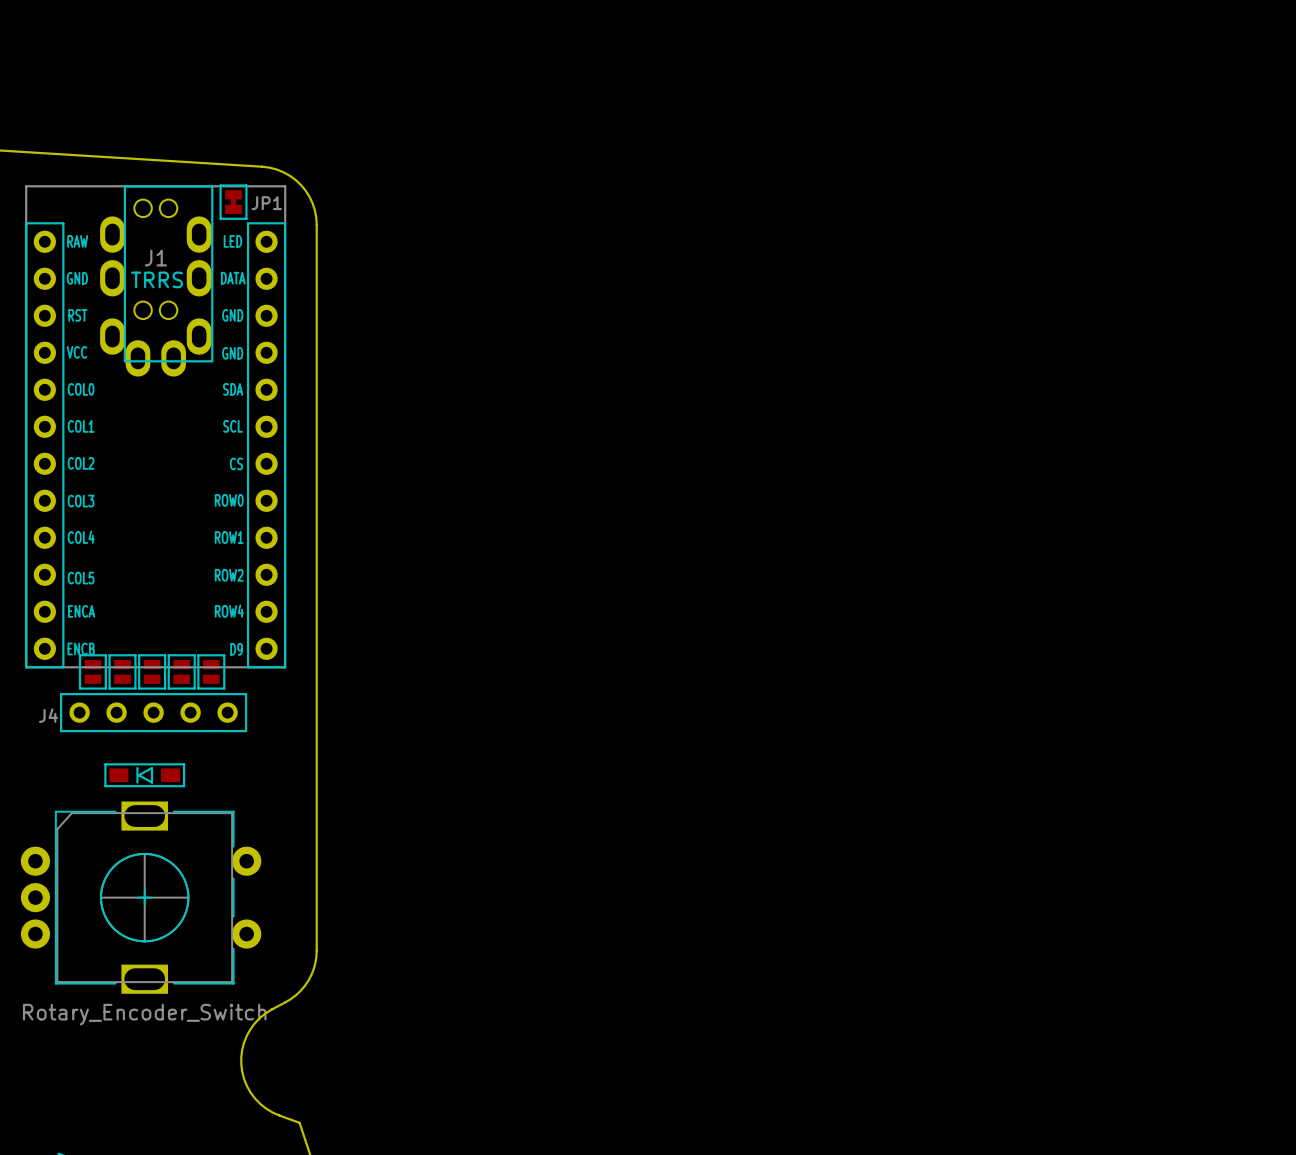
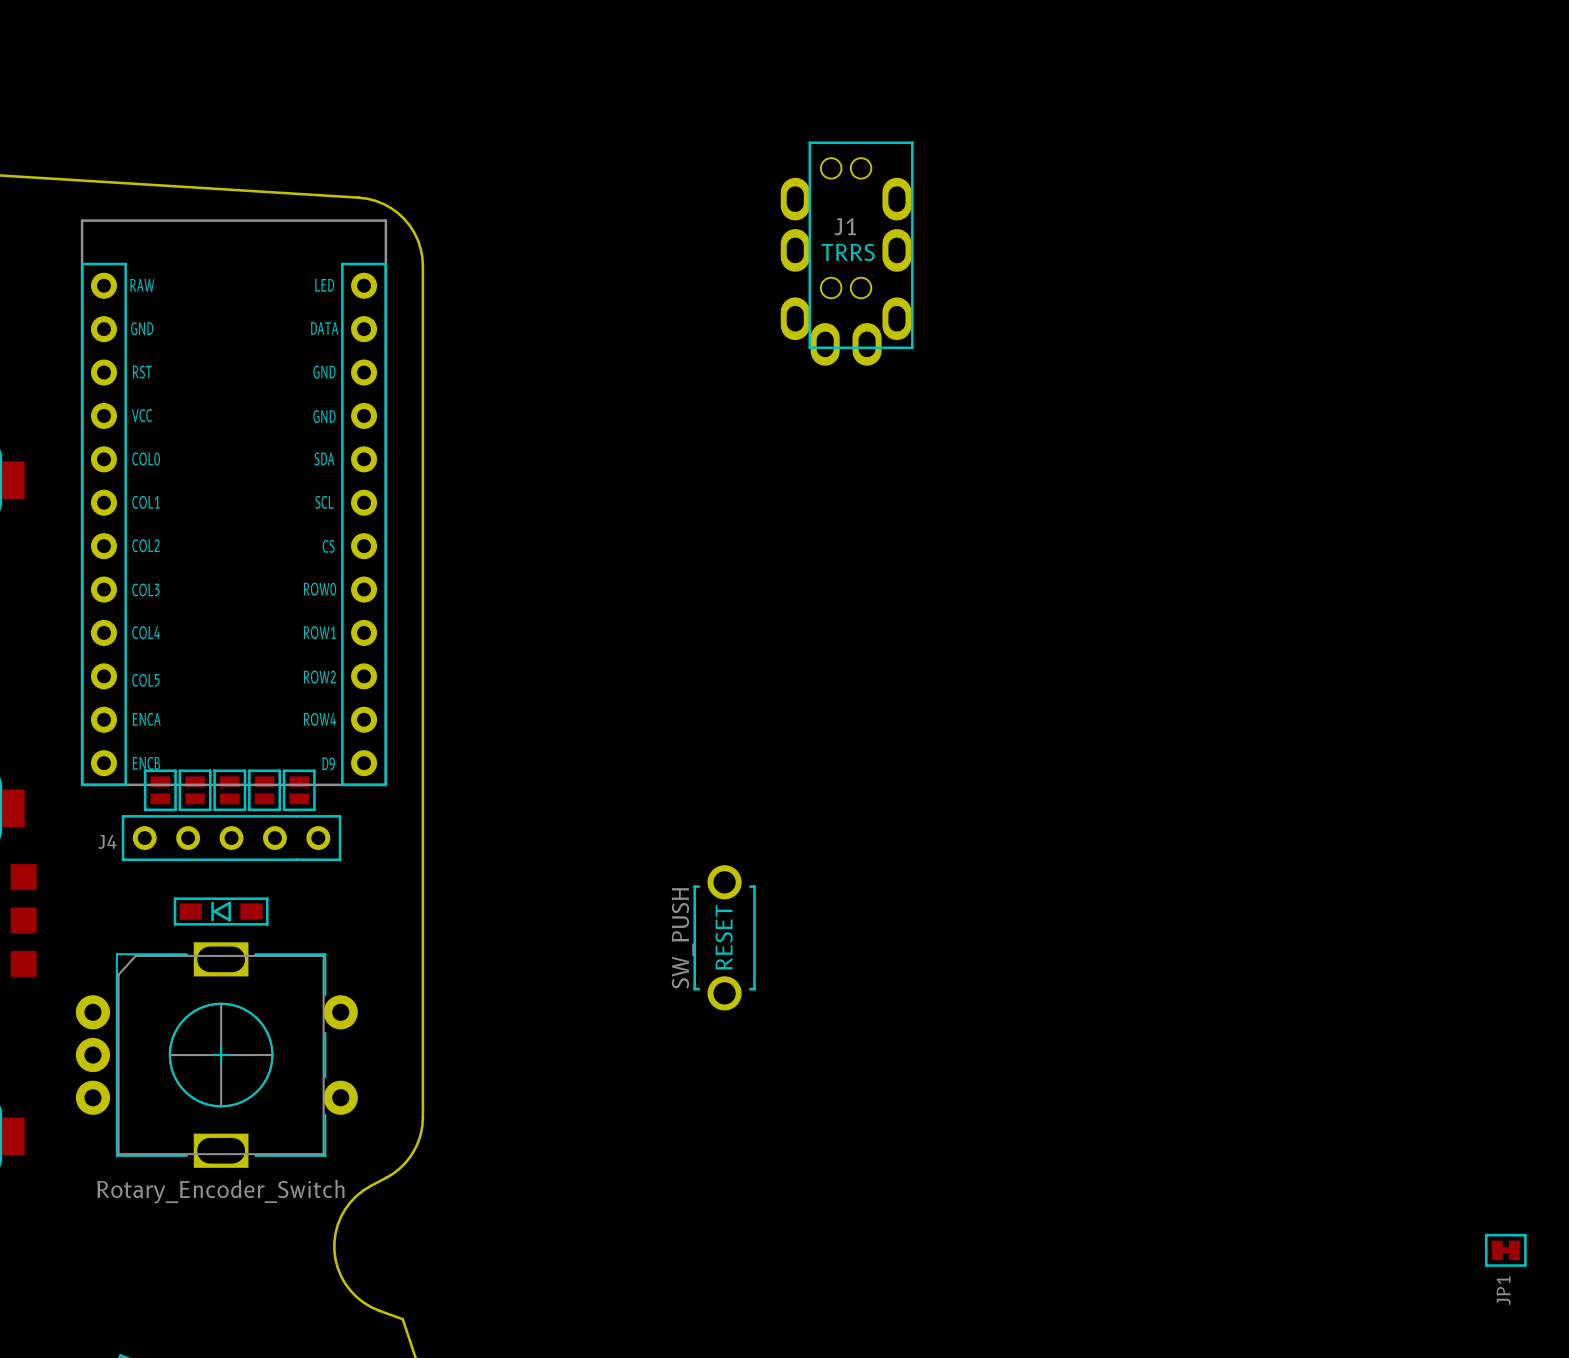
JP1 rotation: 0° (233, 202) -> 90° clockwise (1505, 1250)
JP1 position: (233, 202) -> (1505, 1250)
J1 position: (156, 281) -> (847, 253)
part: none -> SW_PUSH (724, 937)

